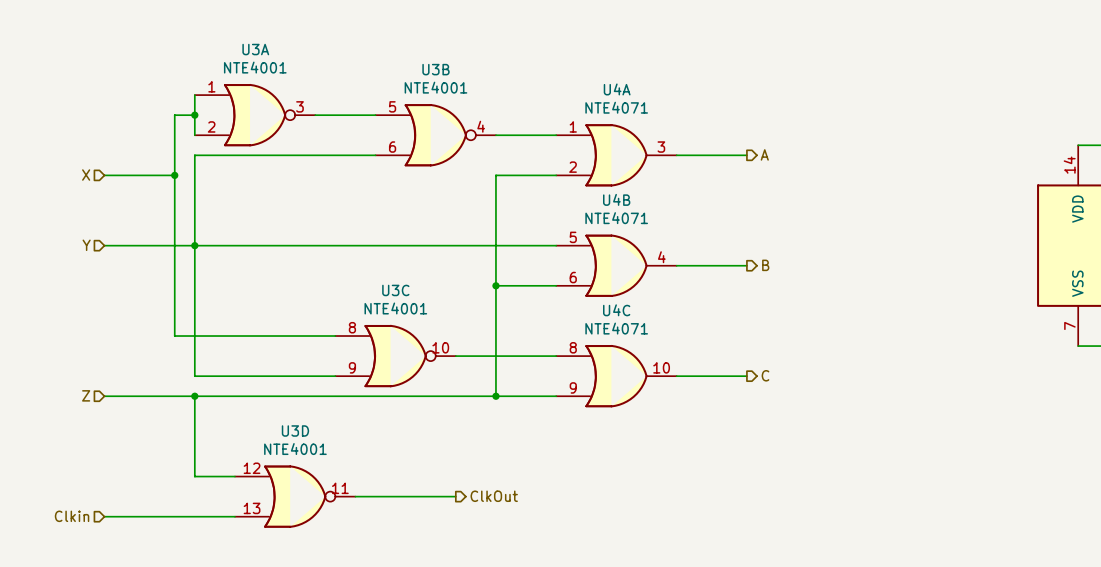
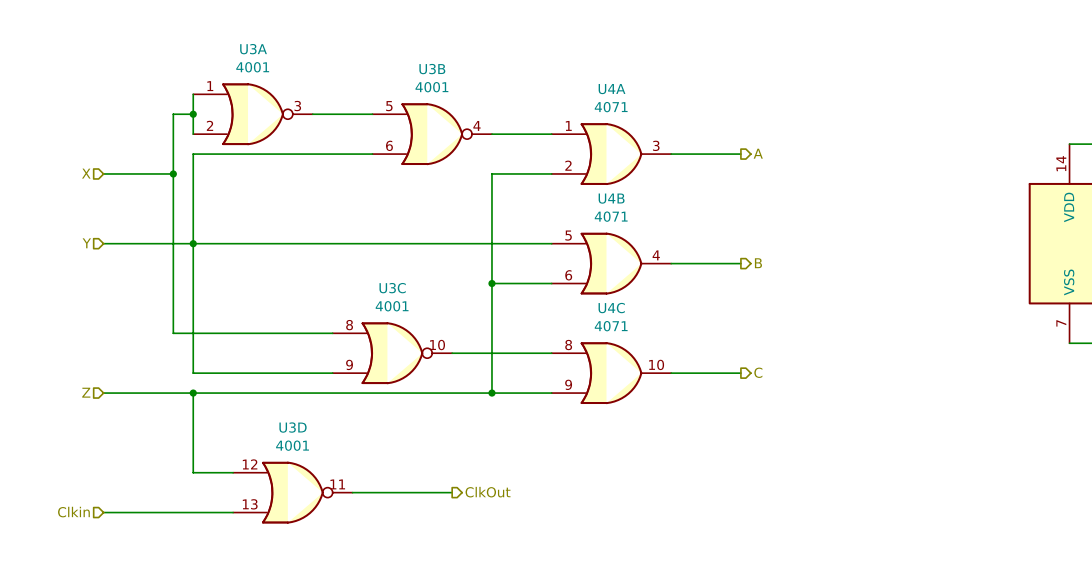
U3A value: NTE4001 (255, 67) -> 4001 (252, 67)
U3B value: NTE4001 (435, 87) -> 4001 (431, 87)
U4A value: NTE4071 (616, 107) -> 4071 (611, 107)
U4B value: NTE4071 (616, 218) -> 4071 (611, 216)
U3C value: NTE4001 (395, 308) -> 4001 (392, 306)
U4C value: NTE4071 (616, 328) -> 4071 (611, 326)
U3D value: NTE4001 (295, 449) -> 4001 (292, 445)

